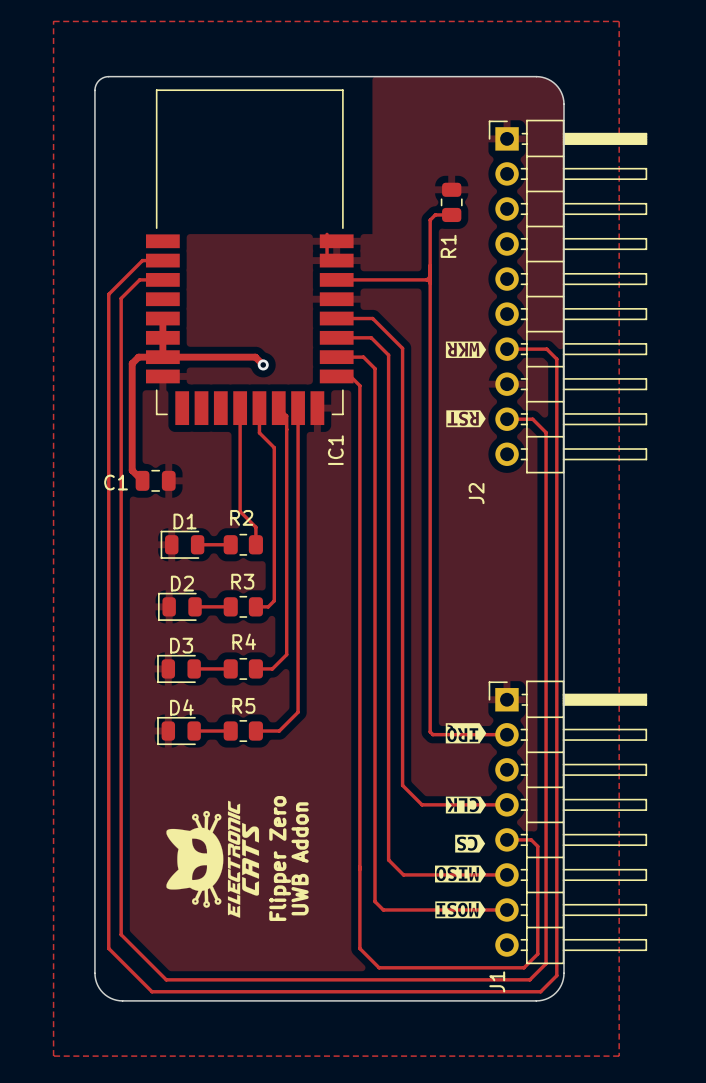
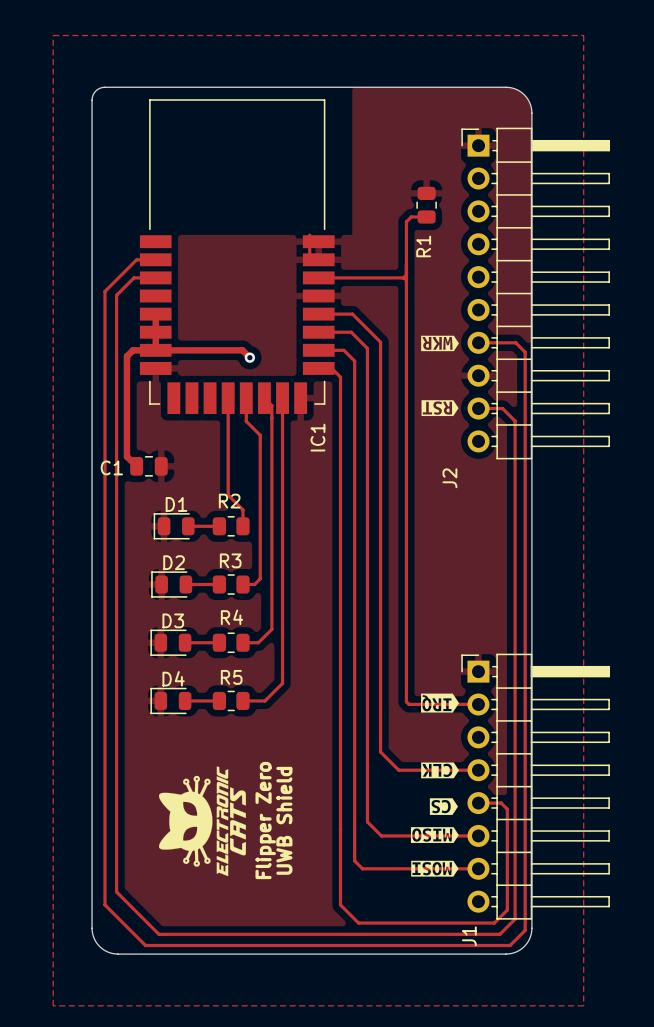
text: UWB Addon (300, 858) -> UWB Shield (284, 820)

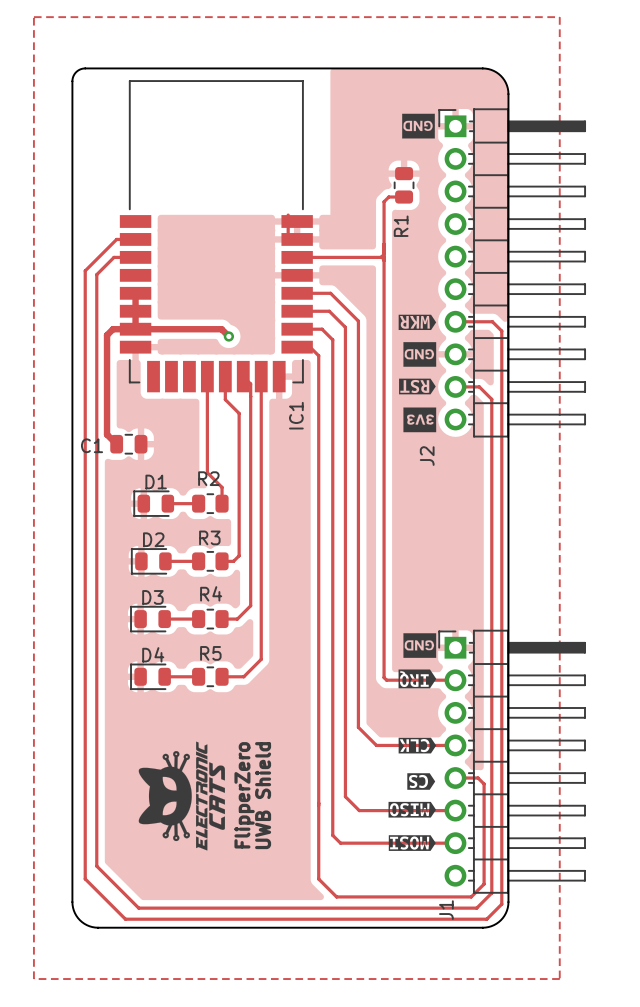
drawing: none -> [402, 113, 435, 139]
drawing: none -> [403, 342, 437, 367]
drawing: none -> [403, 407, 437, 433]
drawing: none -> [403, 633, 437, 658]
text: Flipper Zero (265, 820) -> FlipperZero (244, 795)

